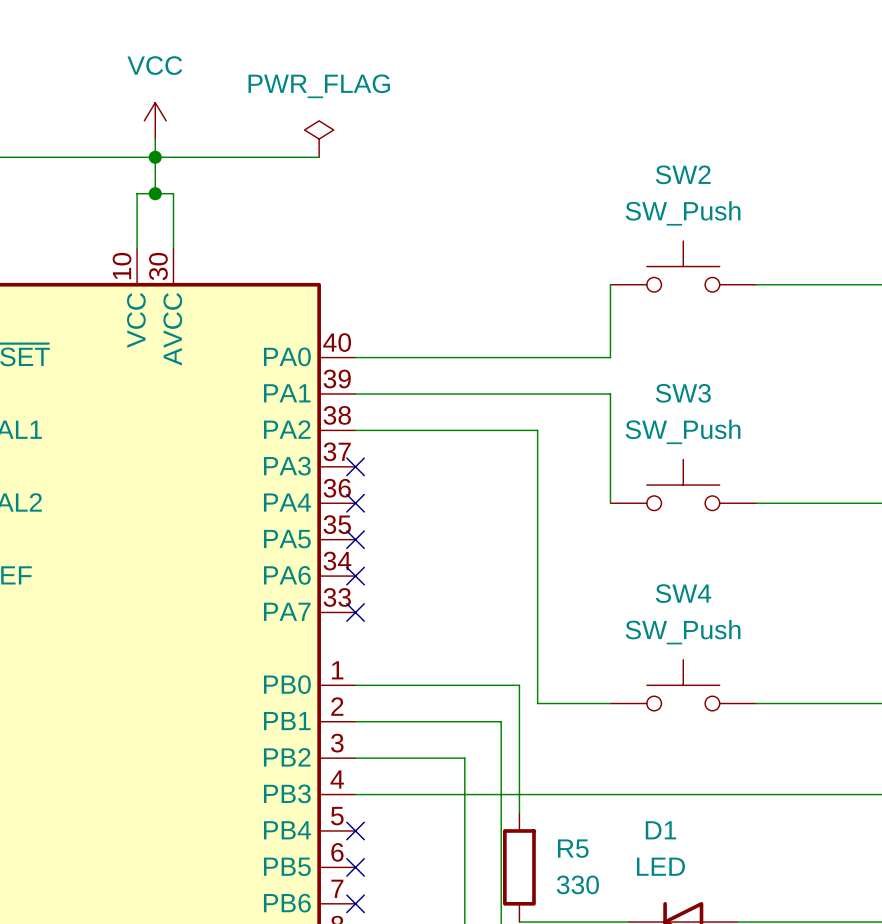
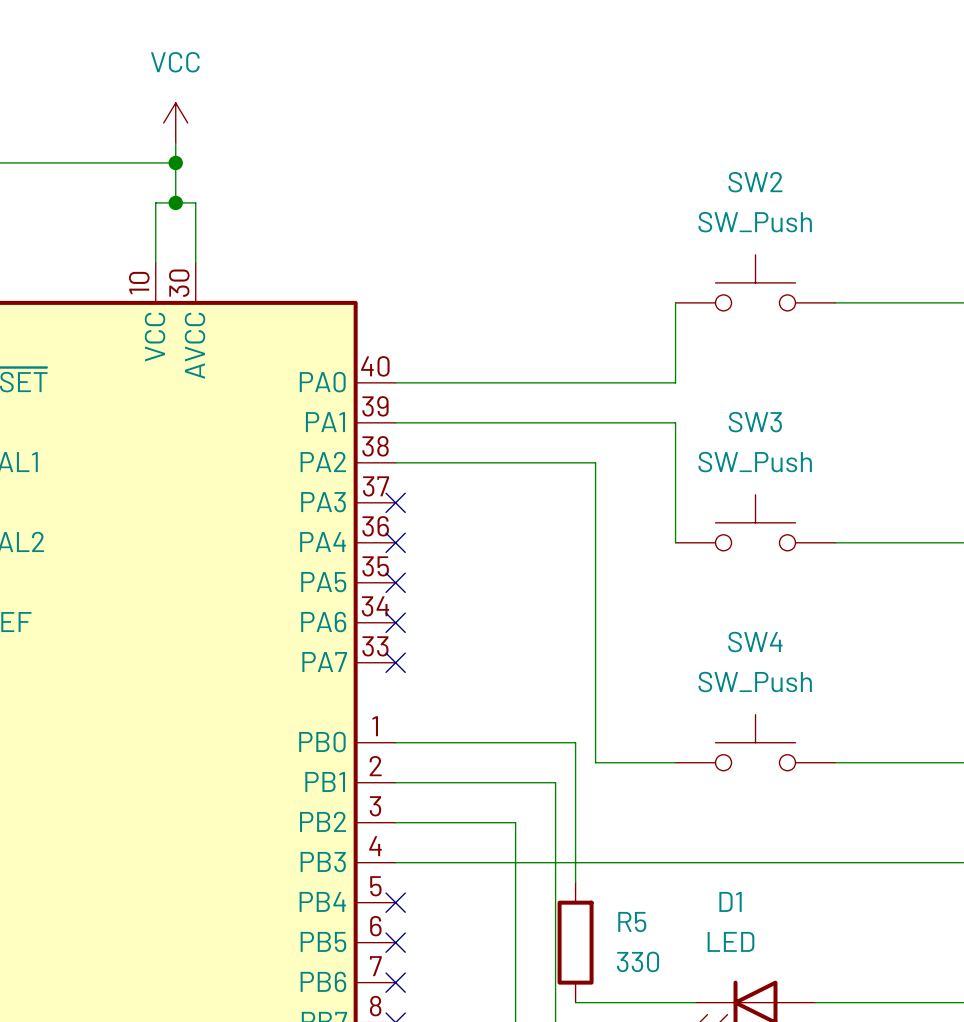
power symbol: PWR_FLAG (319, 139) -> none
wire: (155, 157) (319, 157) -> none

